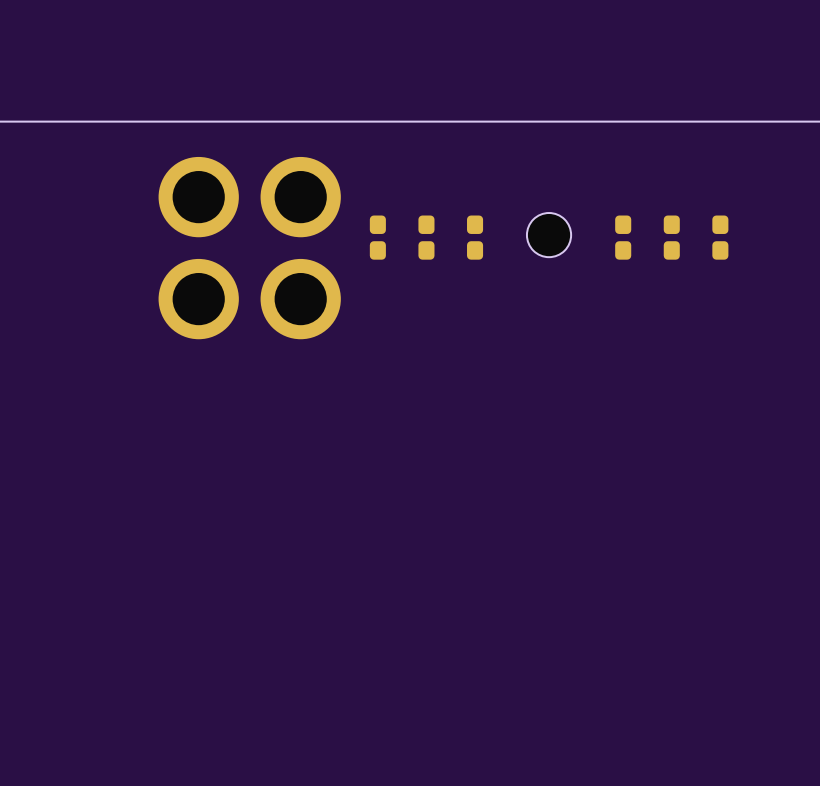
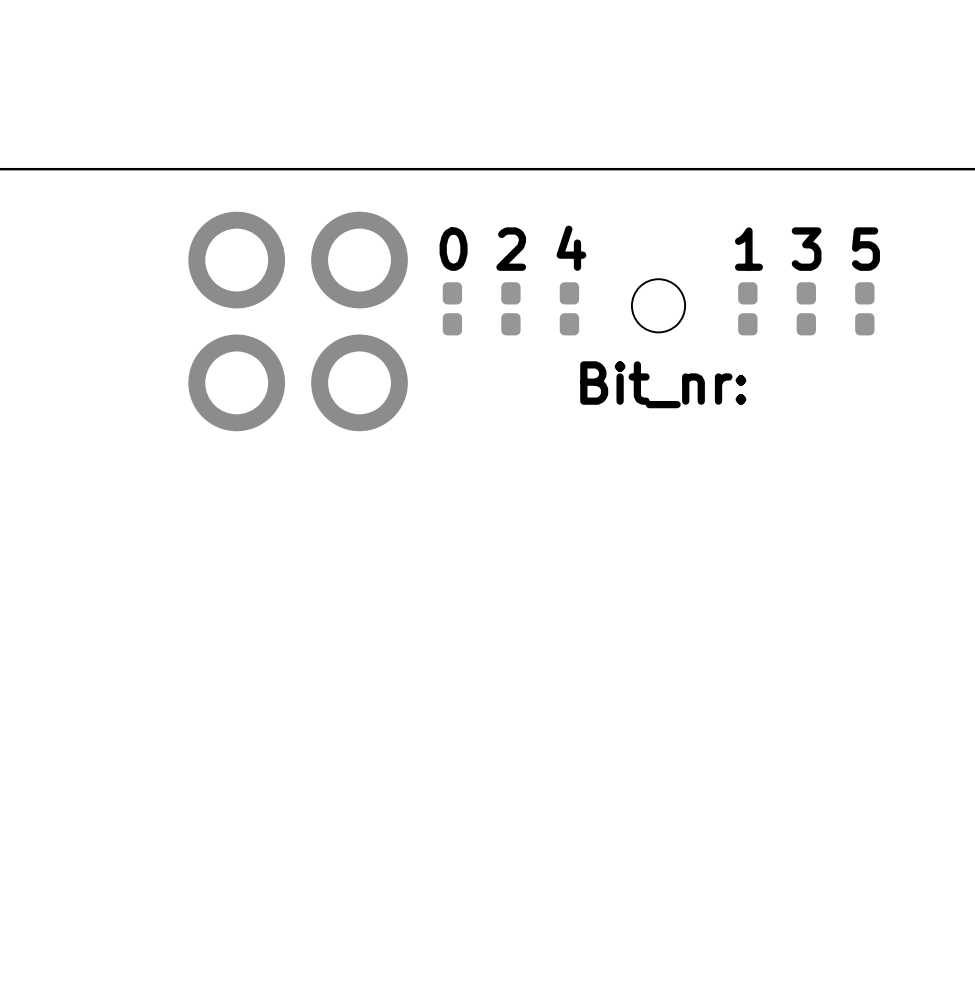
text: none -> 0 (453, 249)
text: none -> 2 (511, 249)
text: none -> 4 (571, 248)
text: none -> 1 (748, 249)
text: none -> 3 (806, 249)
text: none -> 5 (865, 249)
text: none -> Bit_nr: (663, 384)

